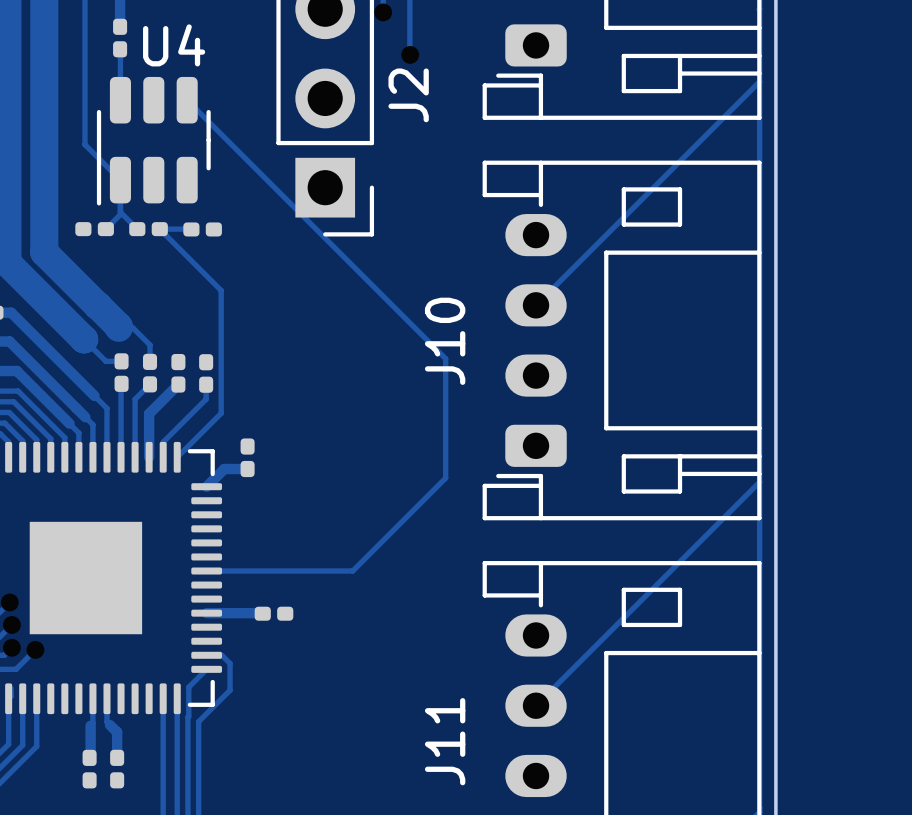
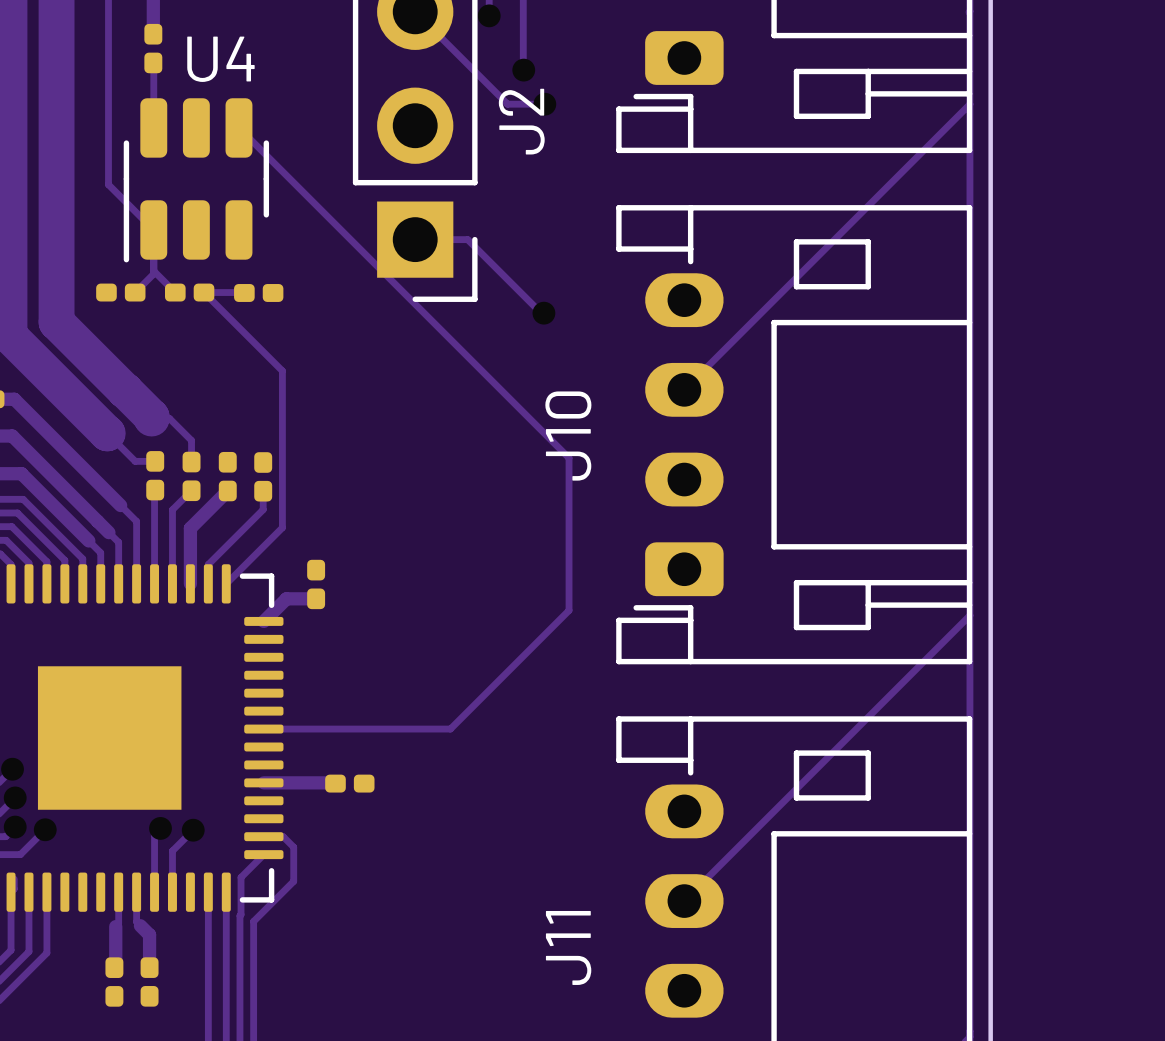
track: none -> (415, 11) (507, 104) (544, 104)
via: none -> (544, 104)
track: none -> (415, 239) (467, 239) (542, 314)
via: none -> (543, 313)
track: none -> (160, 828) (154, 834) (154, 892)
via: none -> (160, 828)
track: none -> (193, 830) (172, 850) (172, 892)
via: none -> (193, 830)

